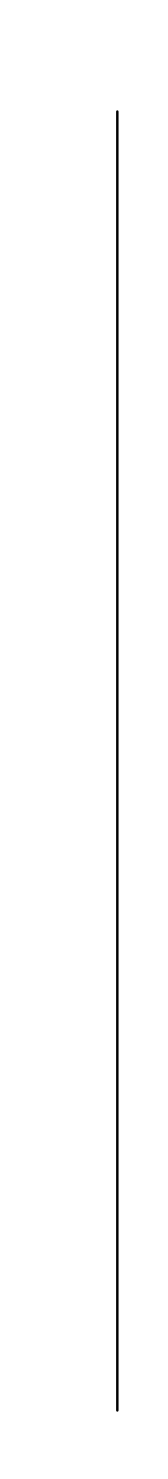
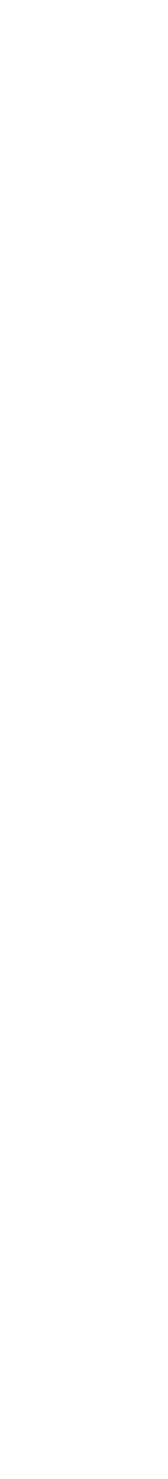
board edge: (117, 111) (117, 1410) -> none

